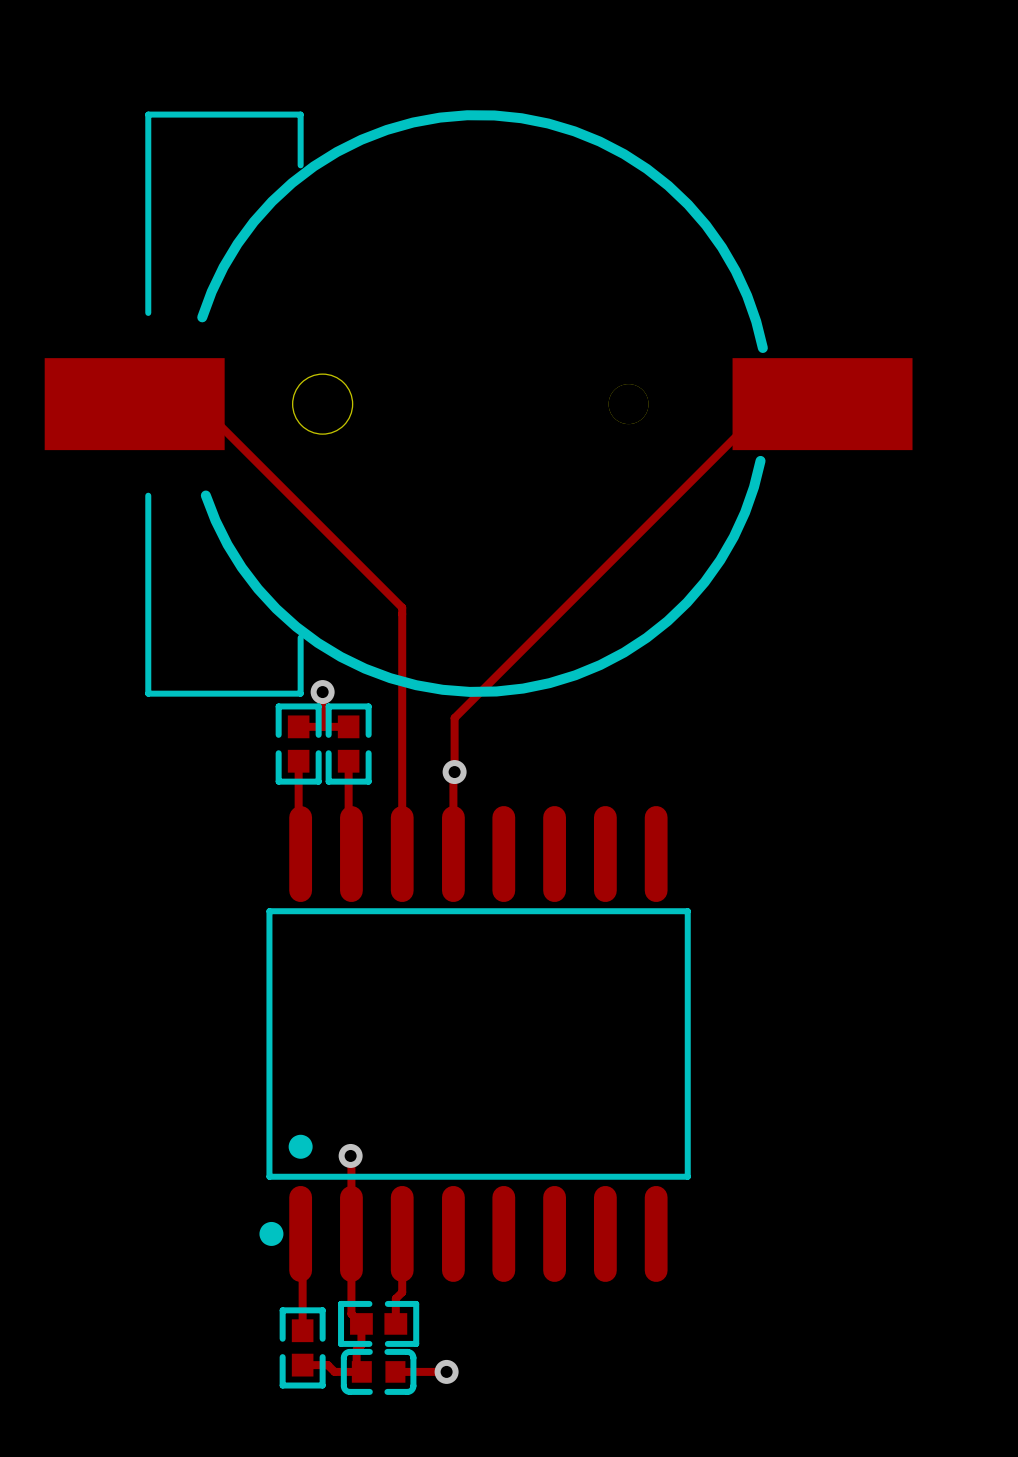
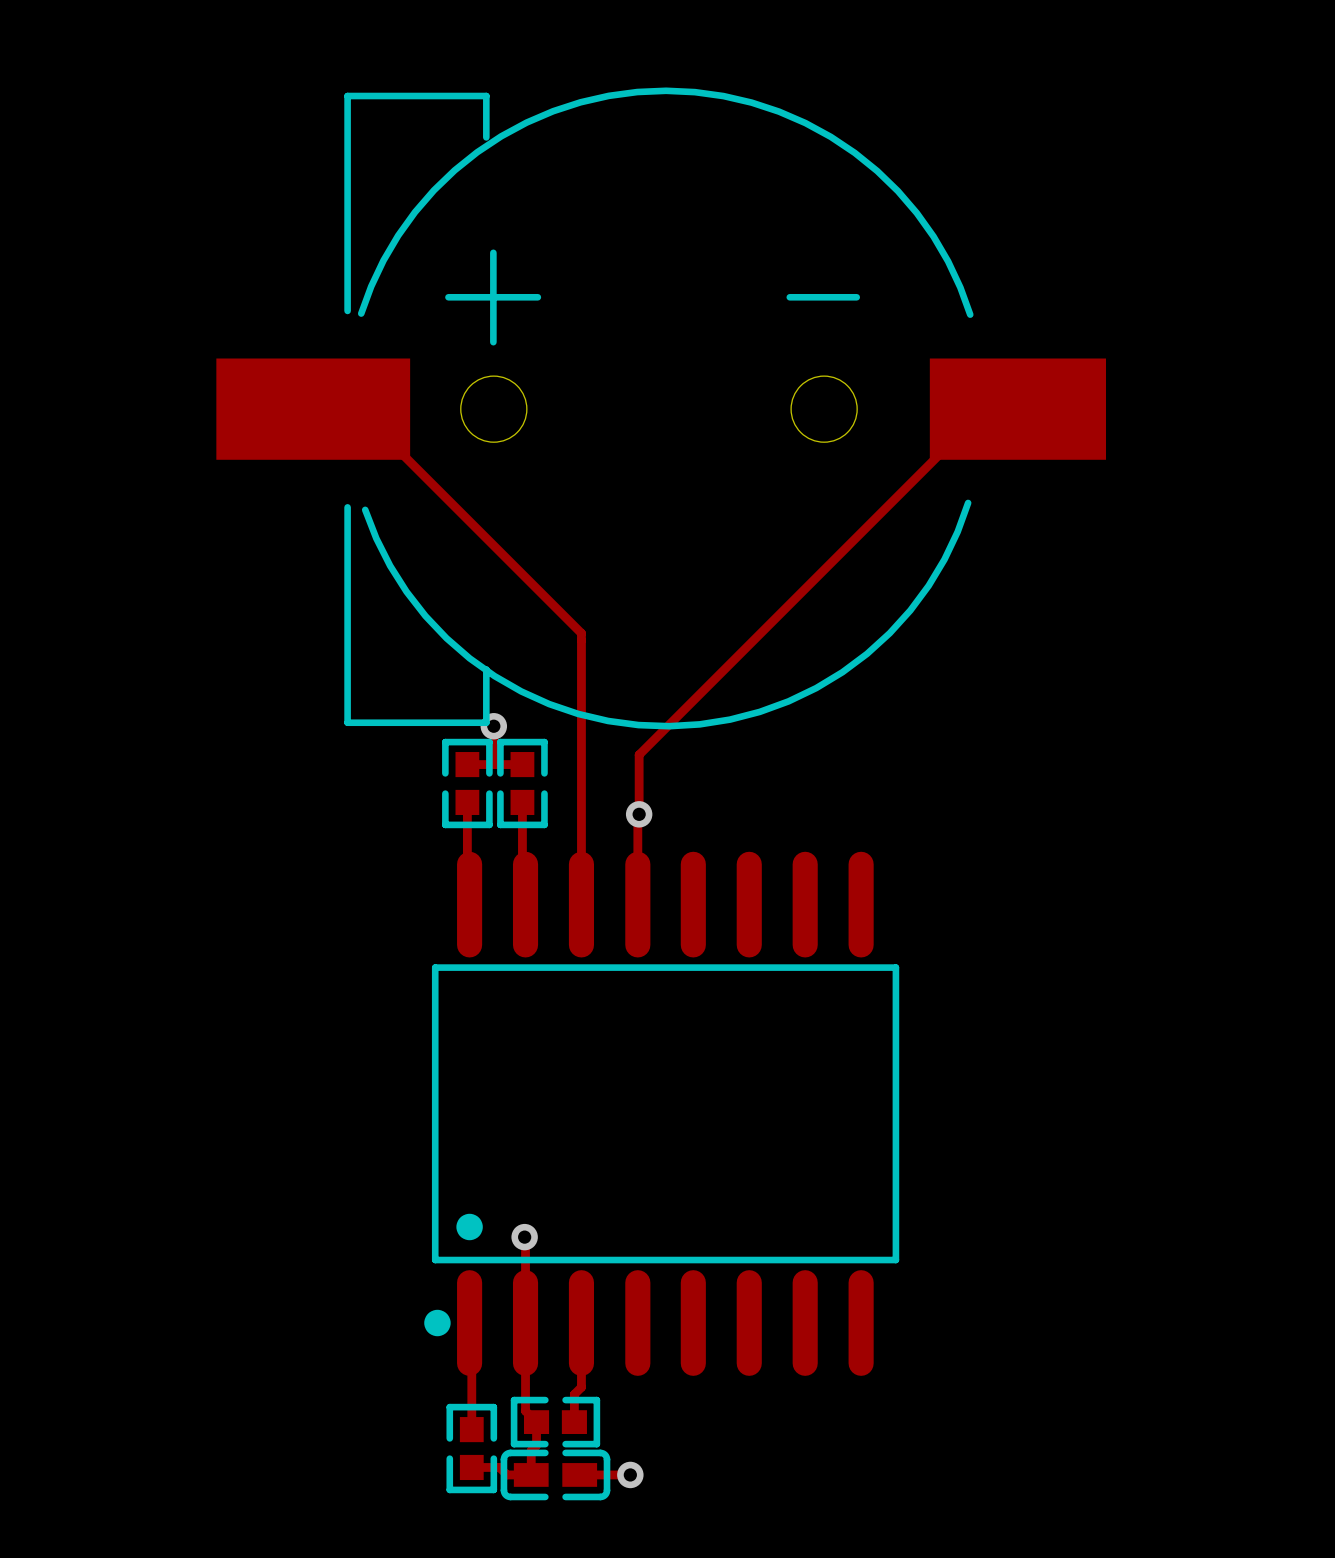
part footprint: [44, 110, 913, 697] -> [216, 87, 1106, 730]
part footprint: [340, 1348, 417, 1395] -> [500, 1449, 611, 1501]

